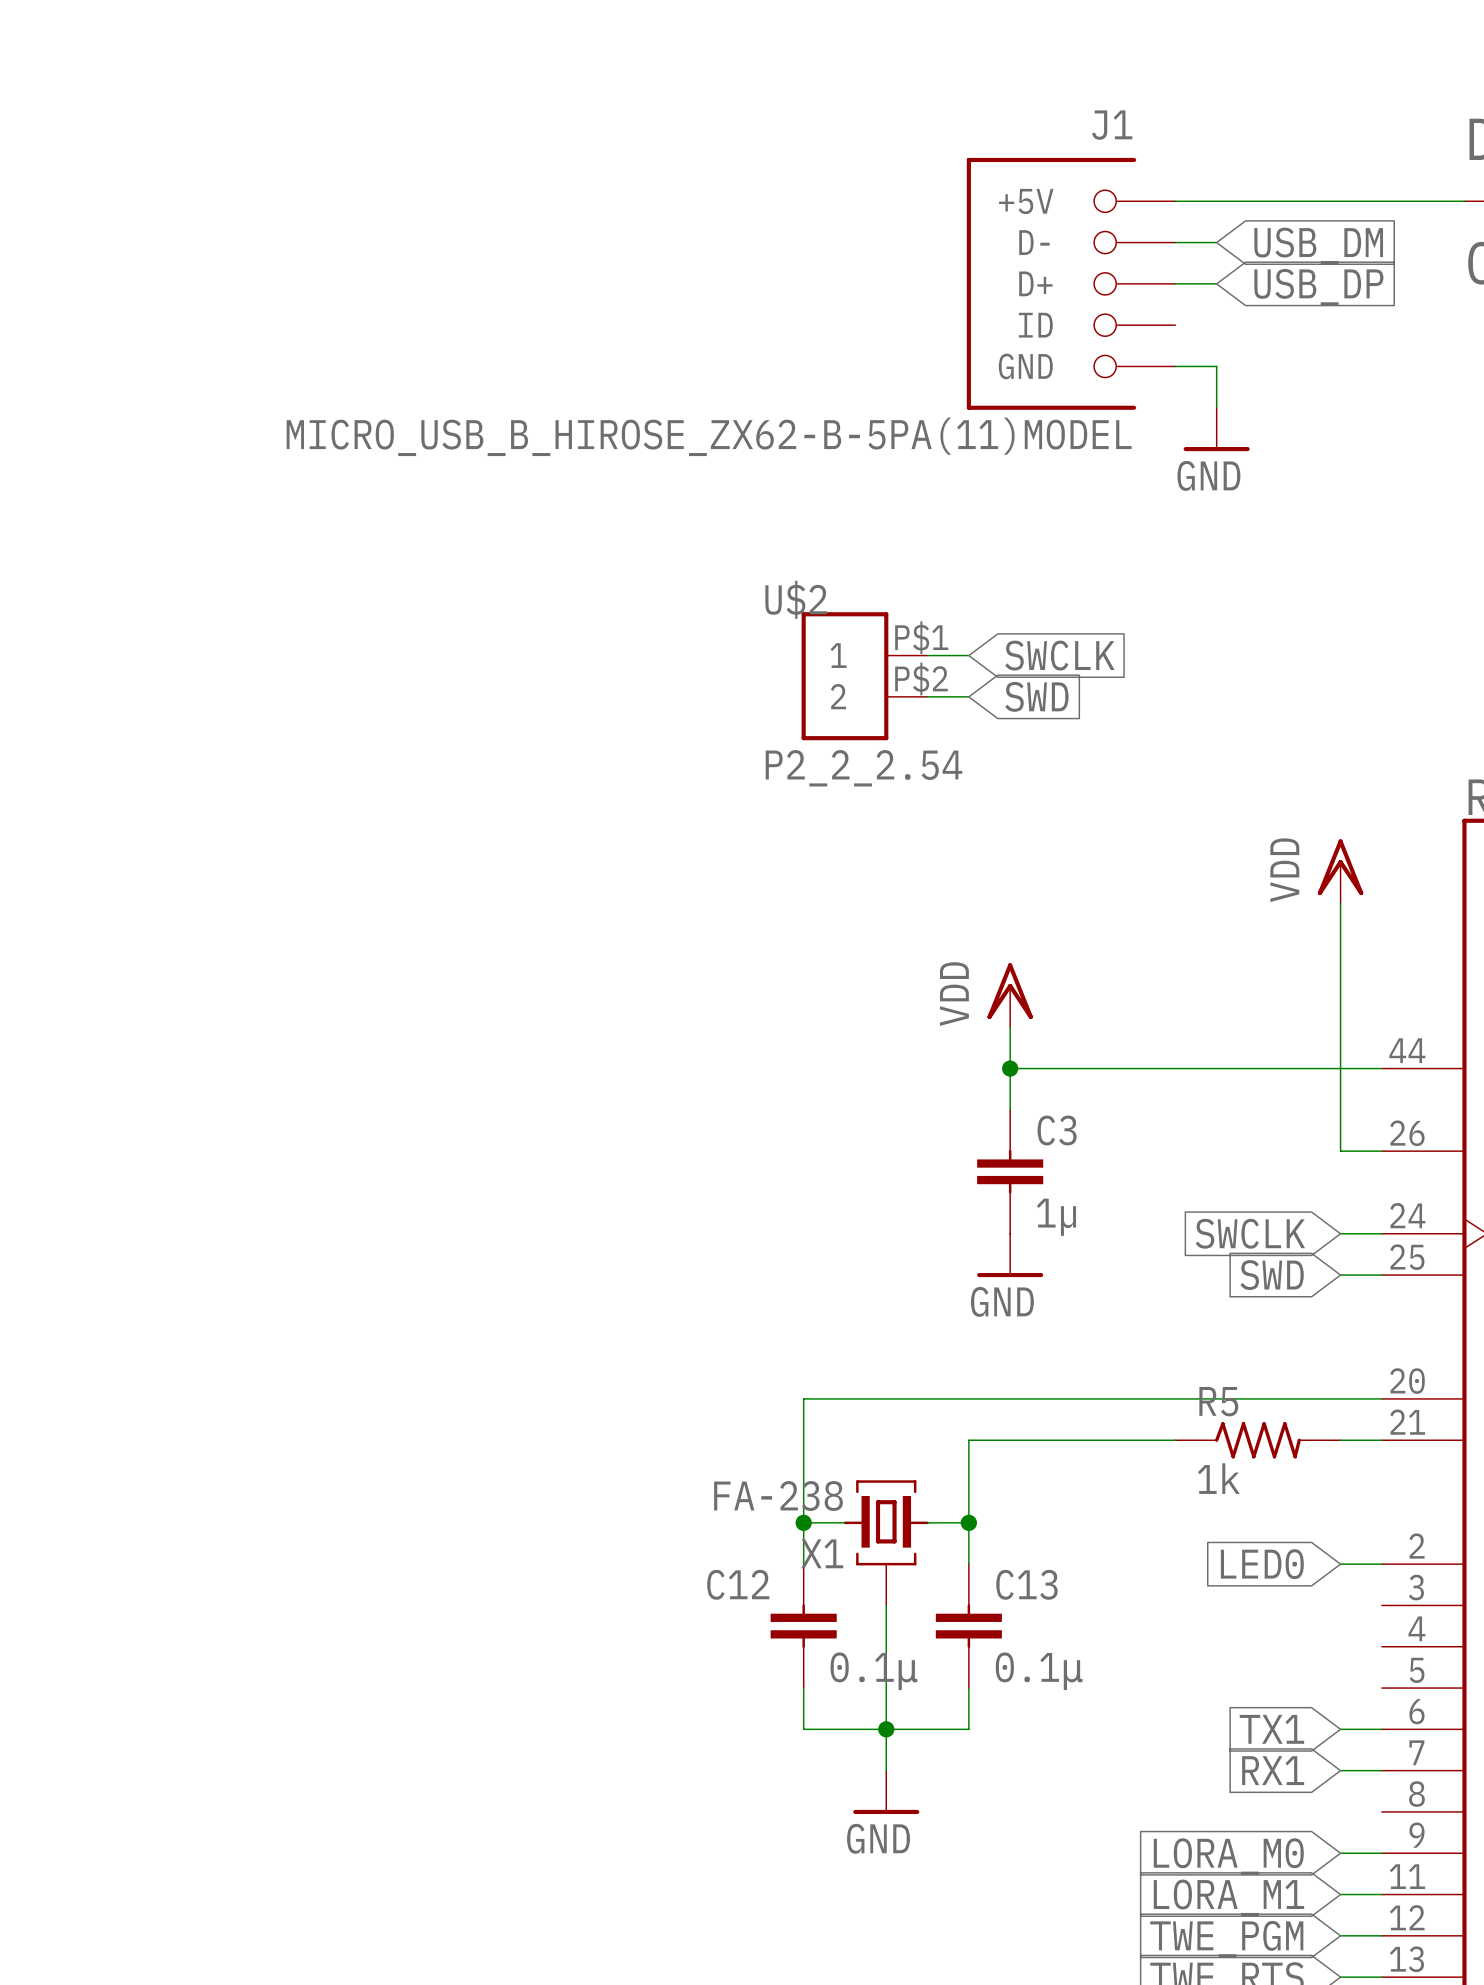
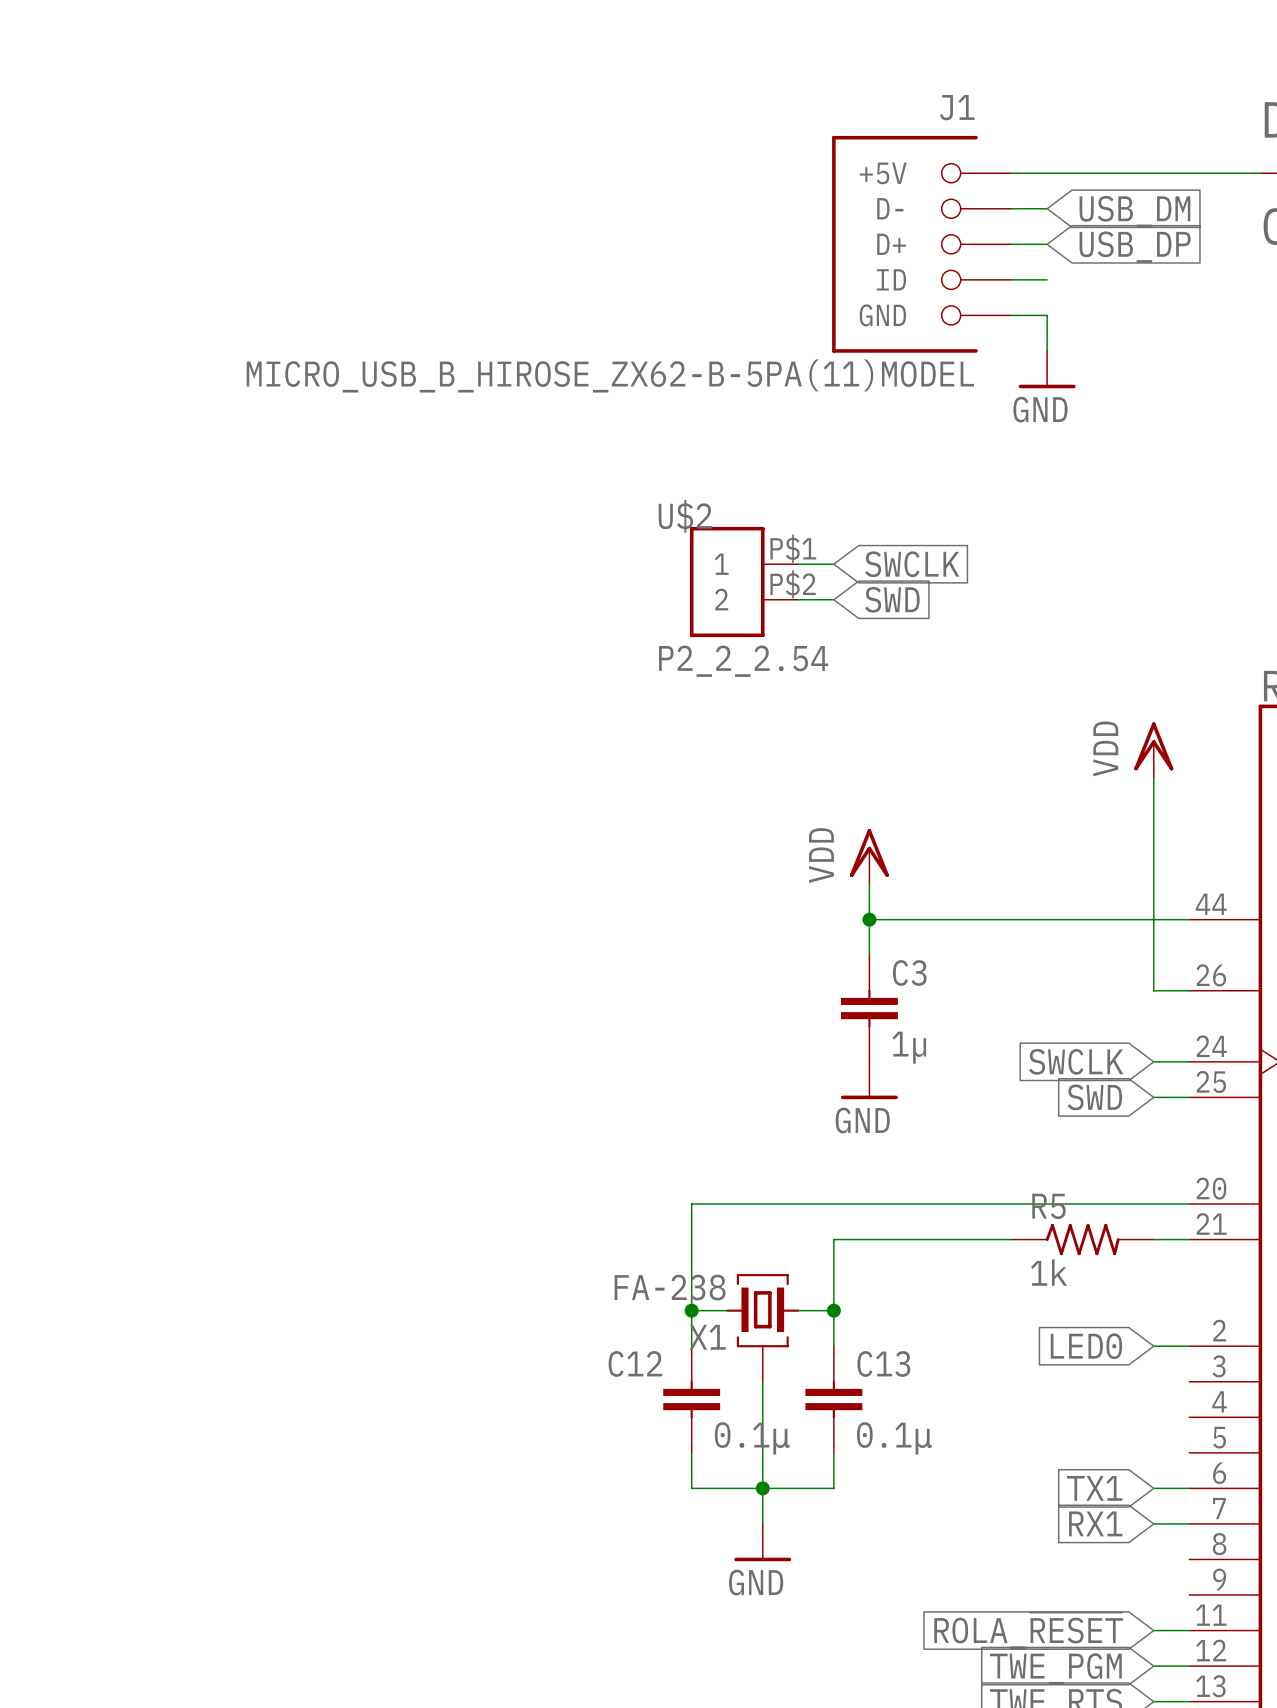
wire: none -> (1011, 279) (1047, 279)
wire: (1340, 1853) (1381, 1853) -> none
global label: LORA_M0 (1228, 1856) -> none
global label: LORA_M1 (1228, 1897) -> ROLA_~{RESET} (1028, 1630)

